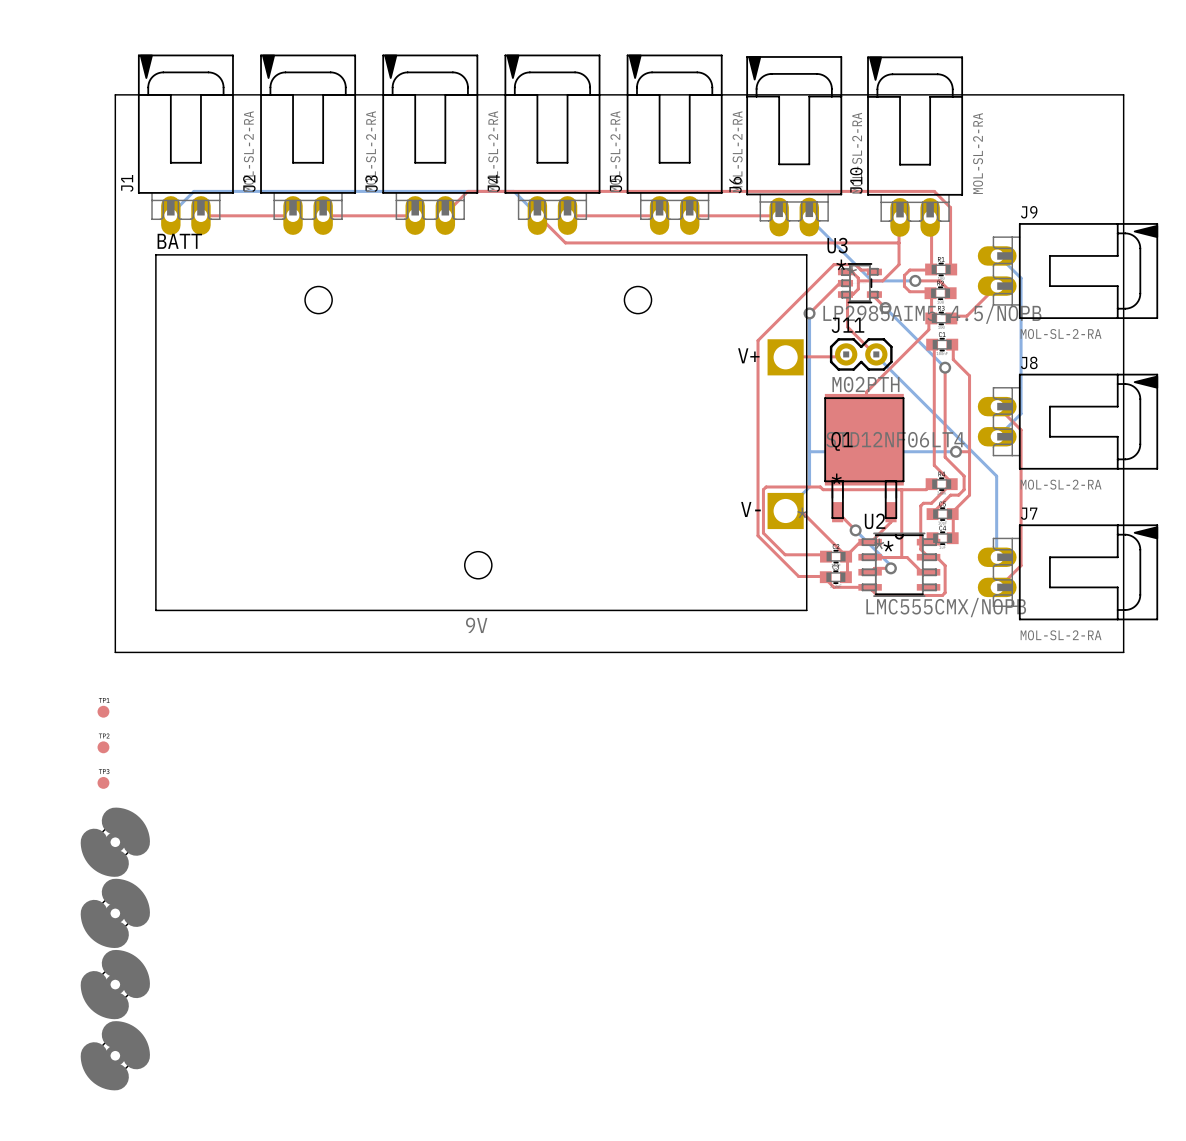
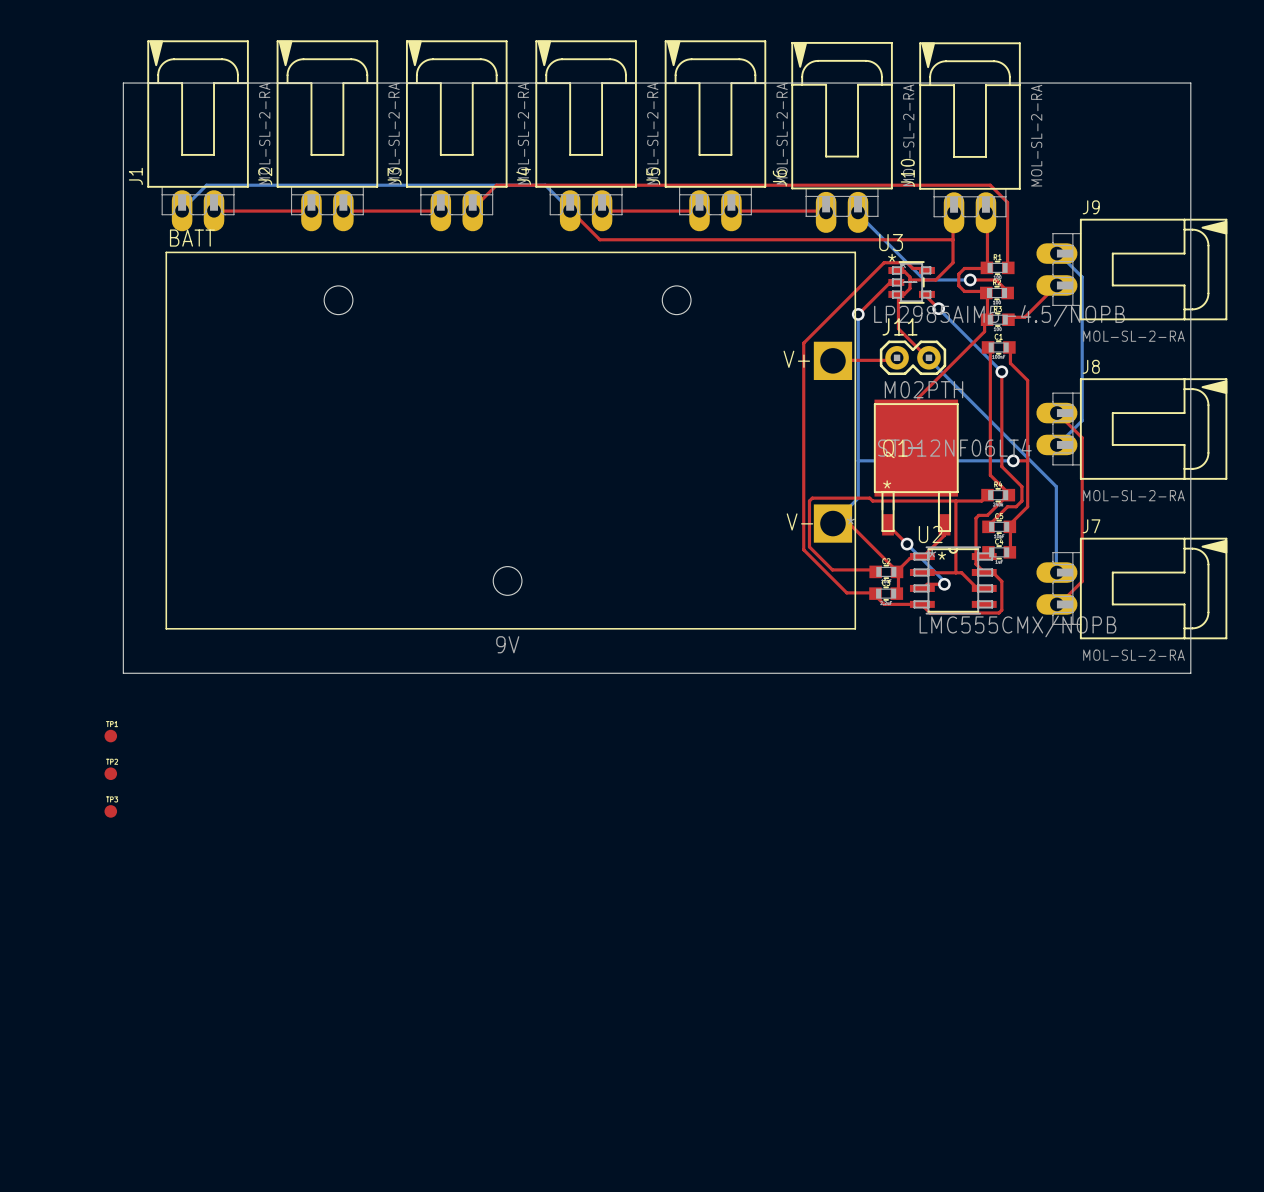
part: (115, 842) -> none
part: (115, 913) -> none
part: (115, 984) -> none
part: (115, 1055) -> none

